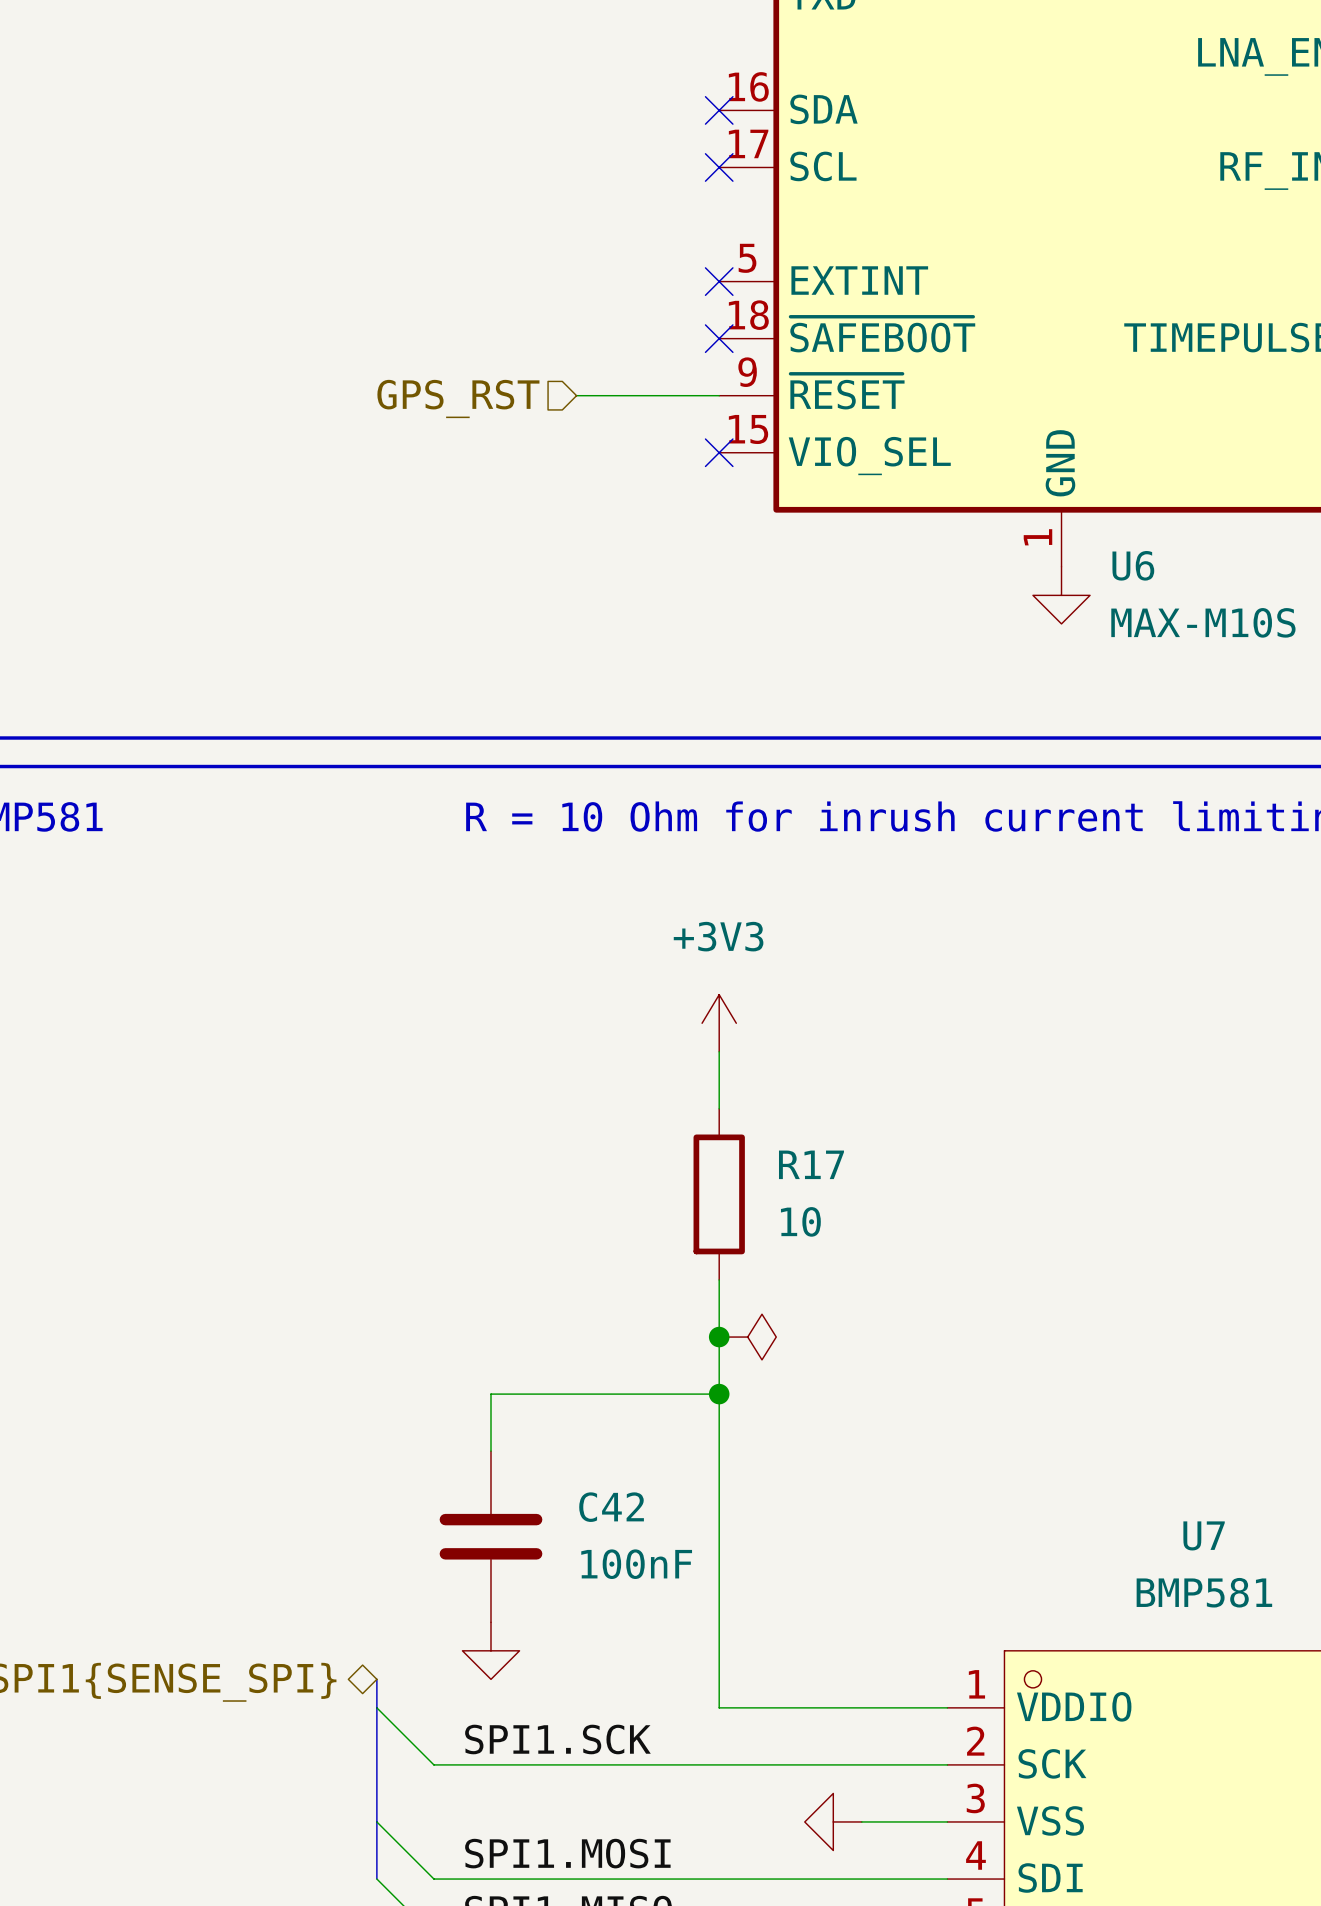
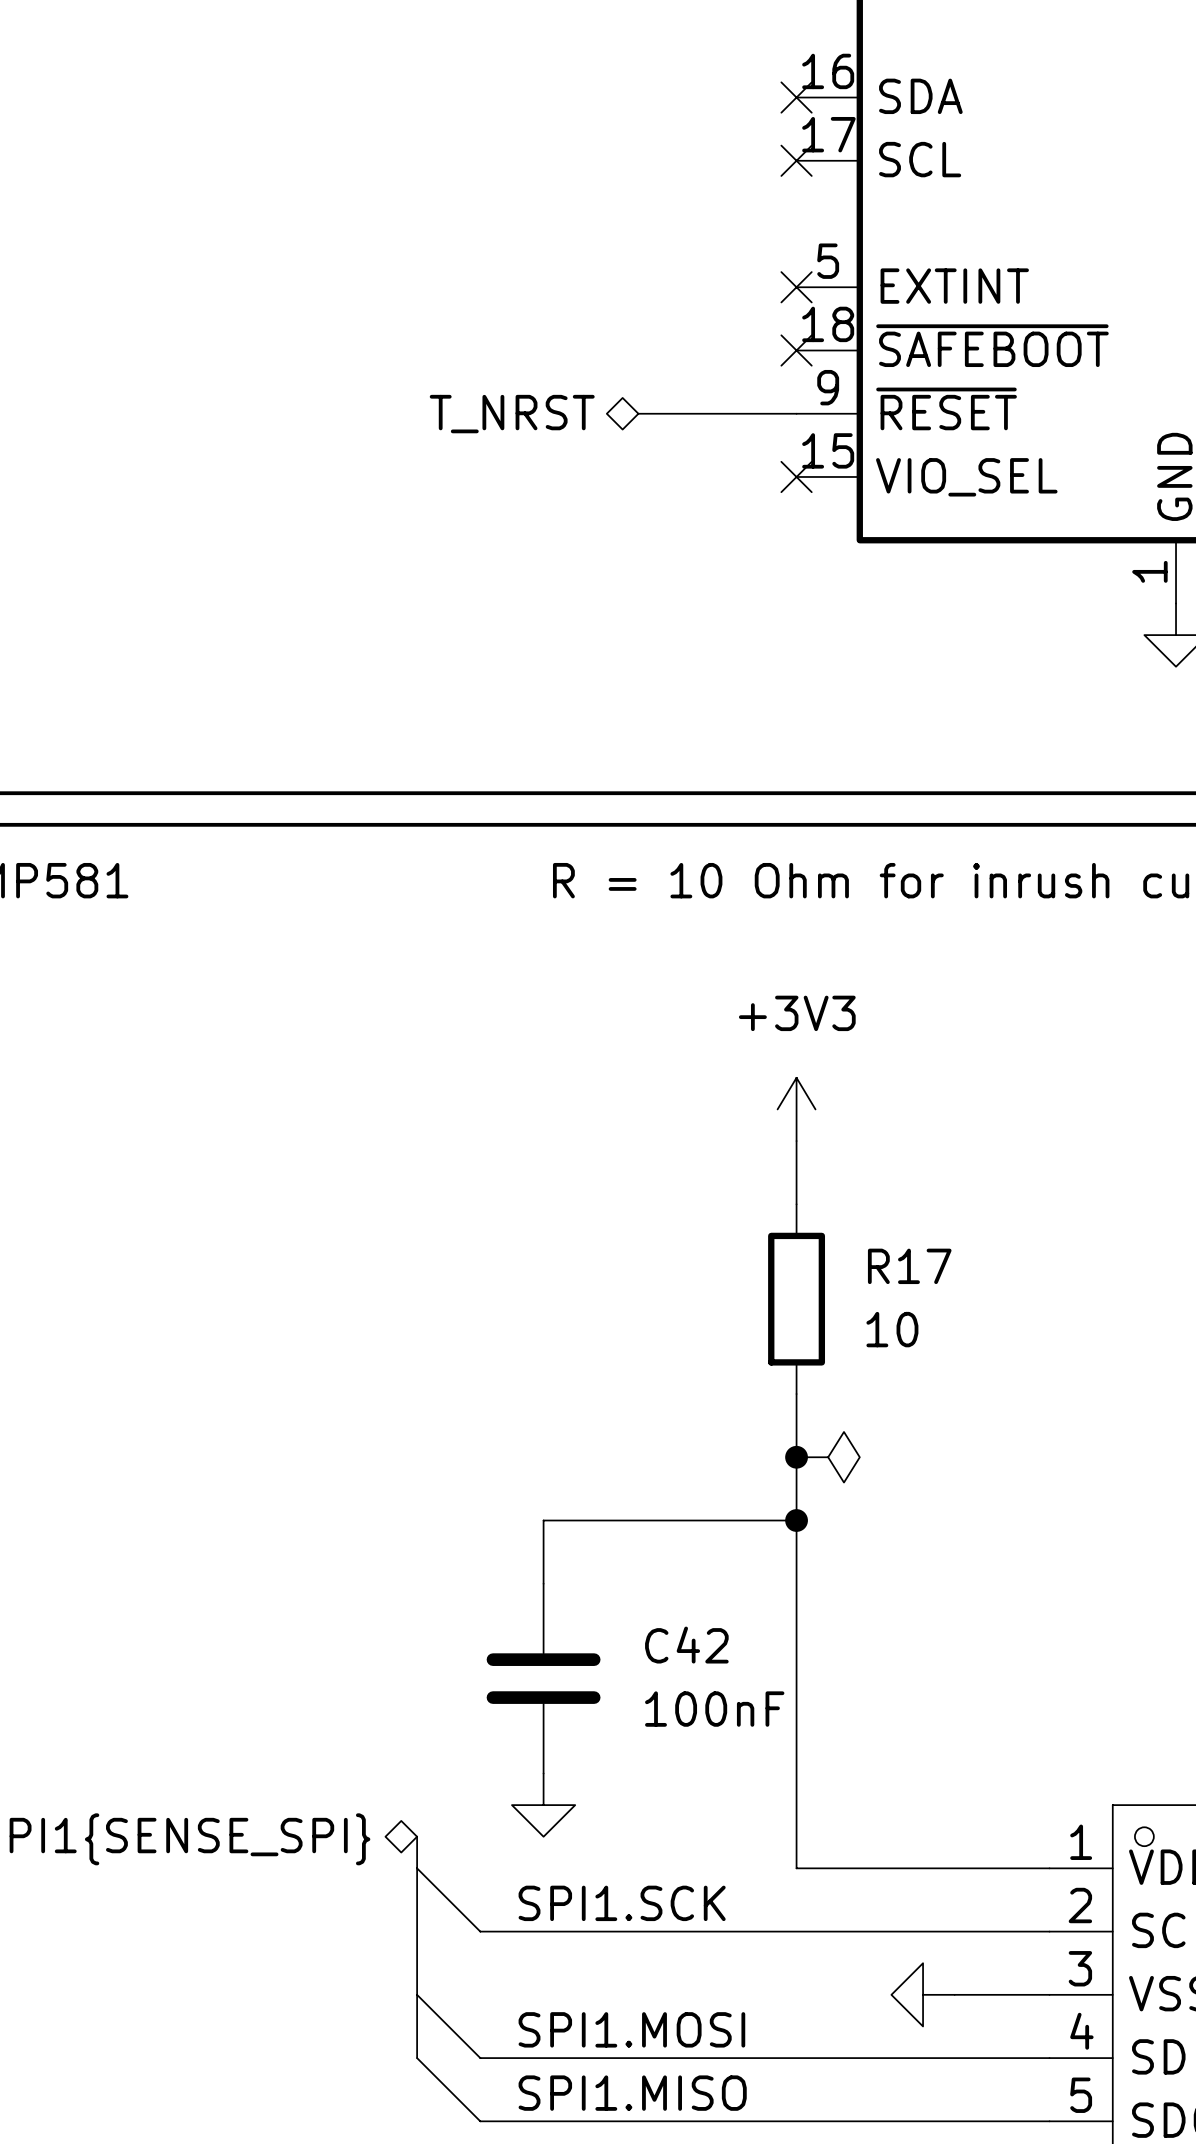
hierarchical label shape: input (458, 398) -> bidirectional (512, 414)
hierarchical label: GPS_RST (458, 398) -> T_NRST (512, 414)

